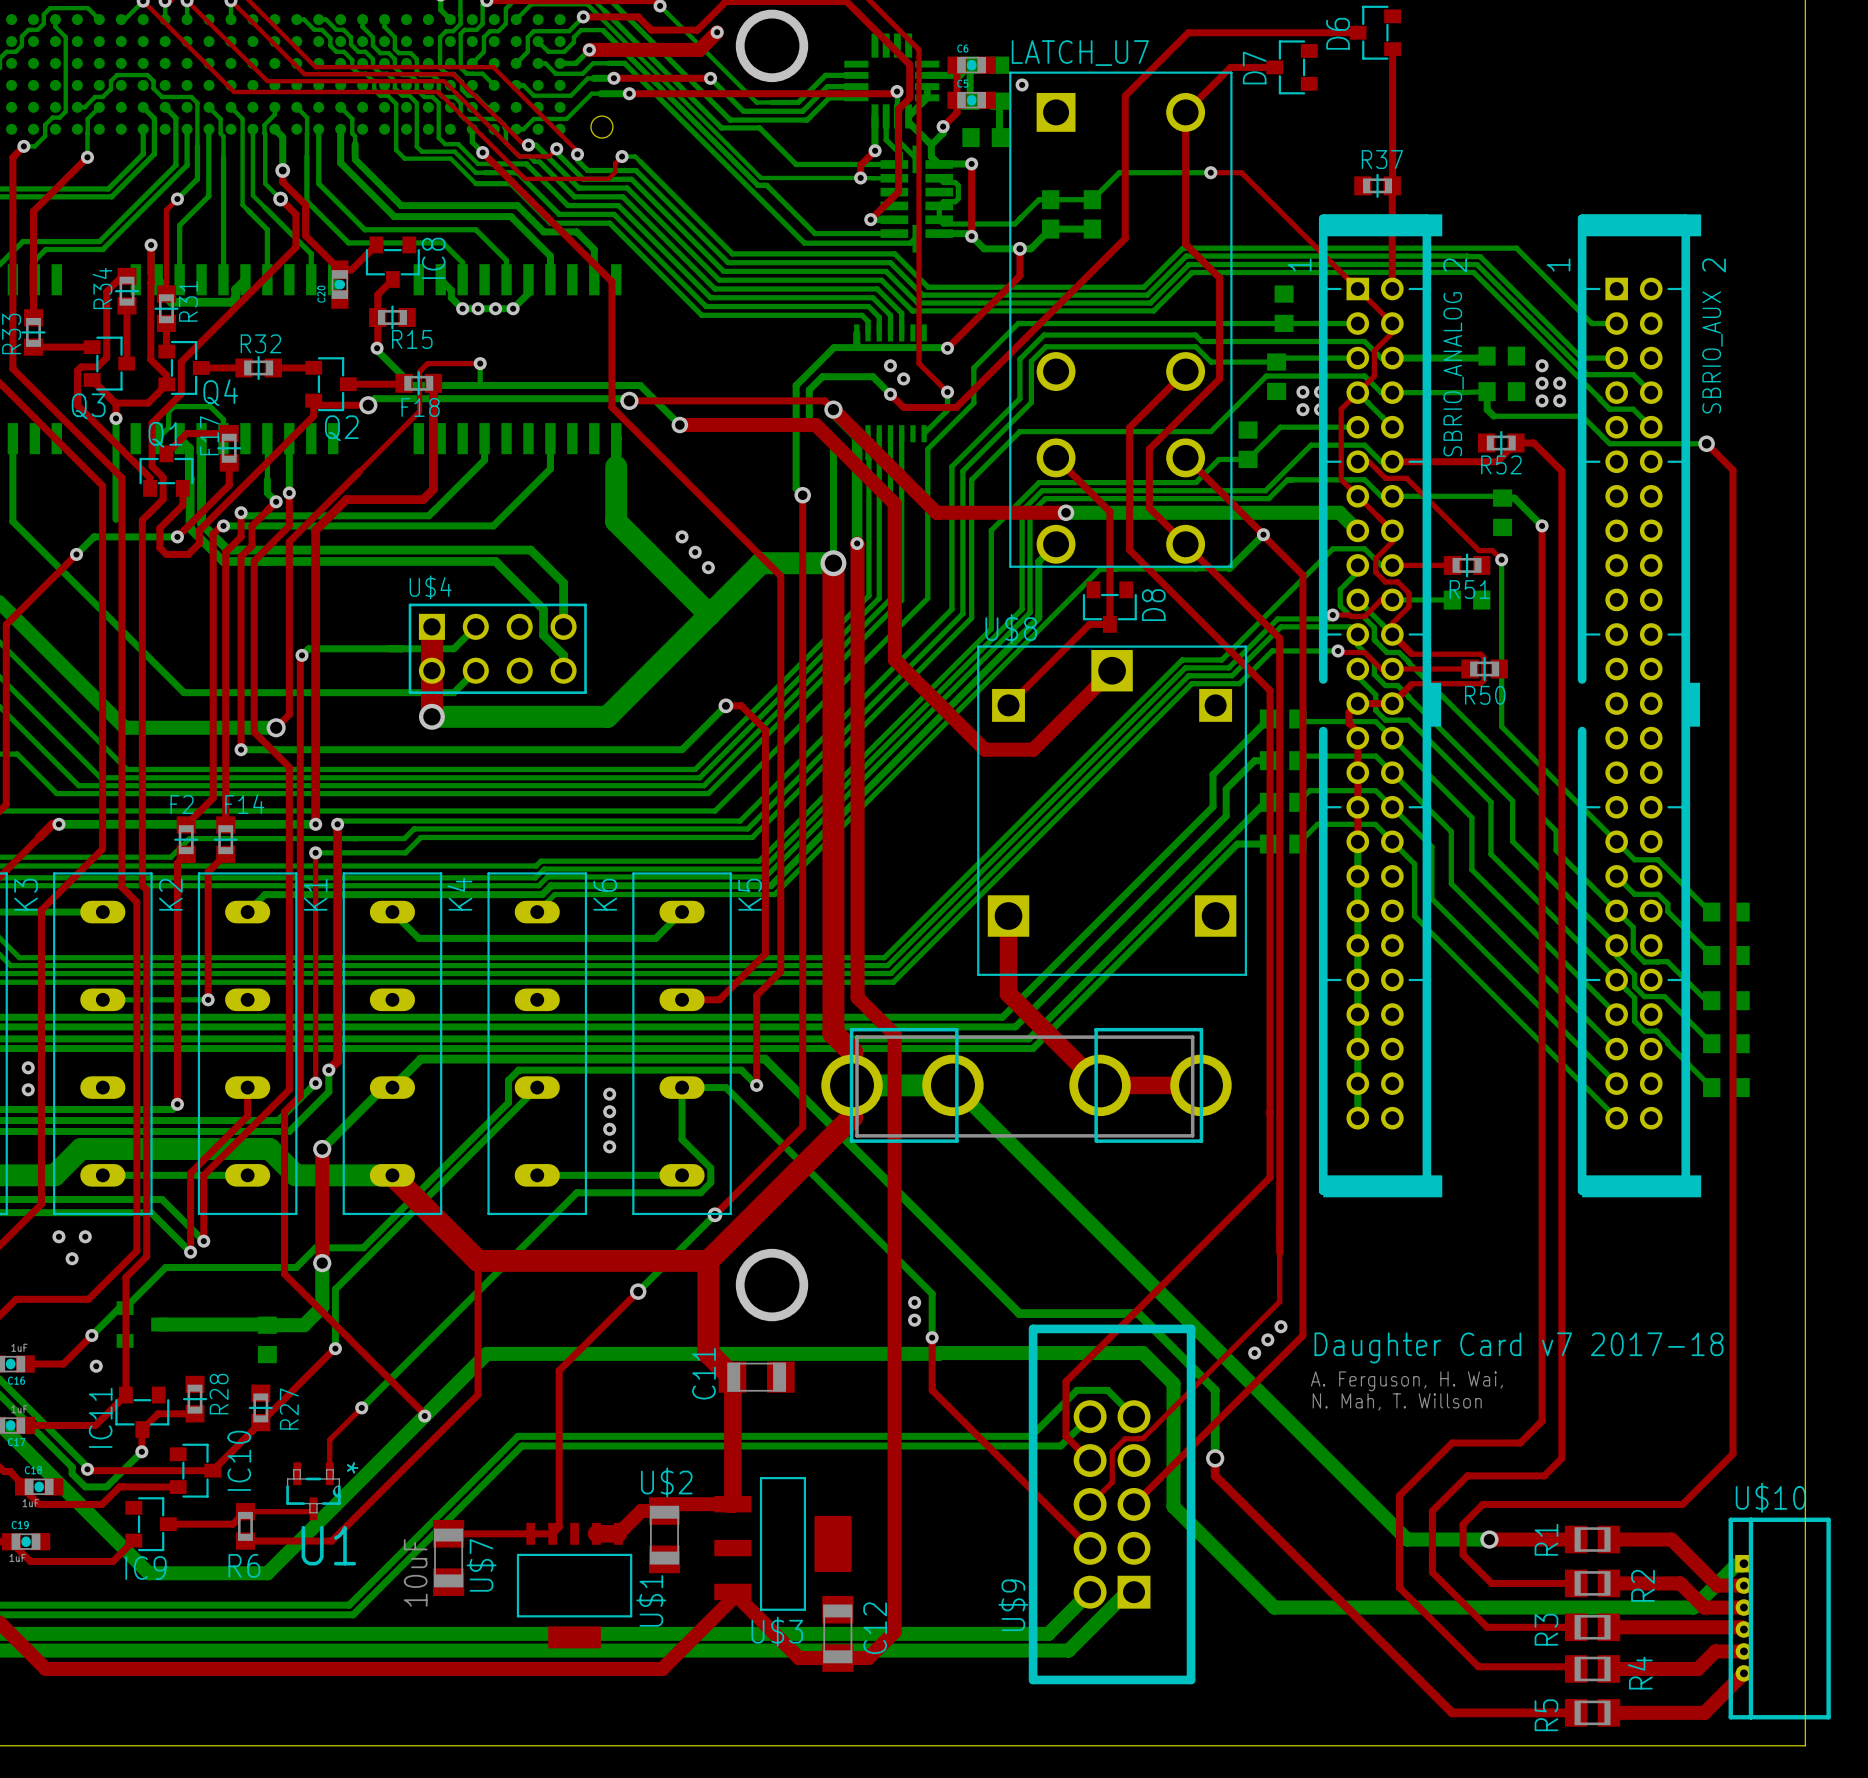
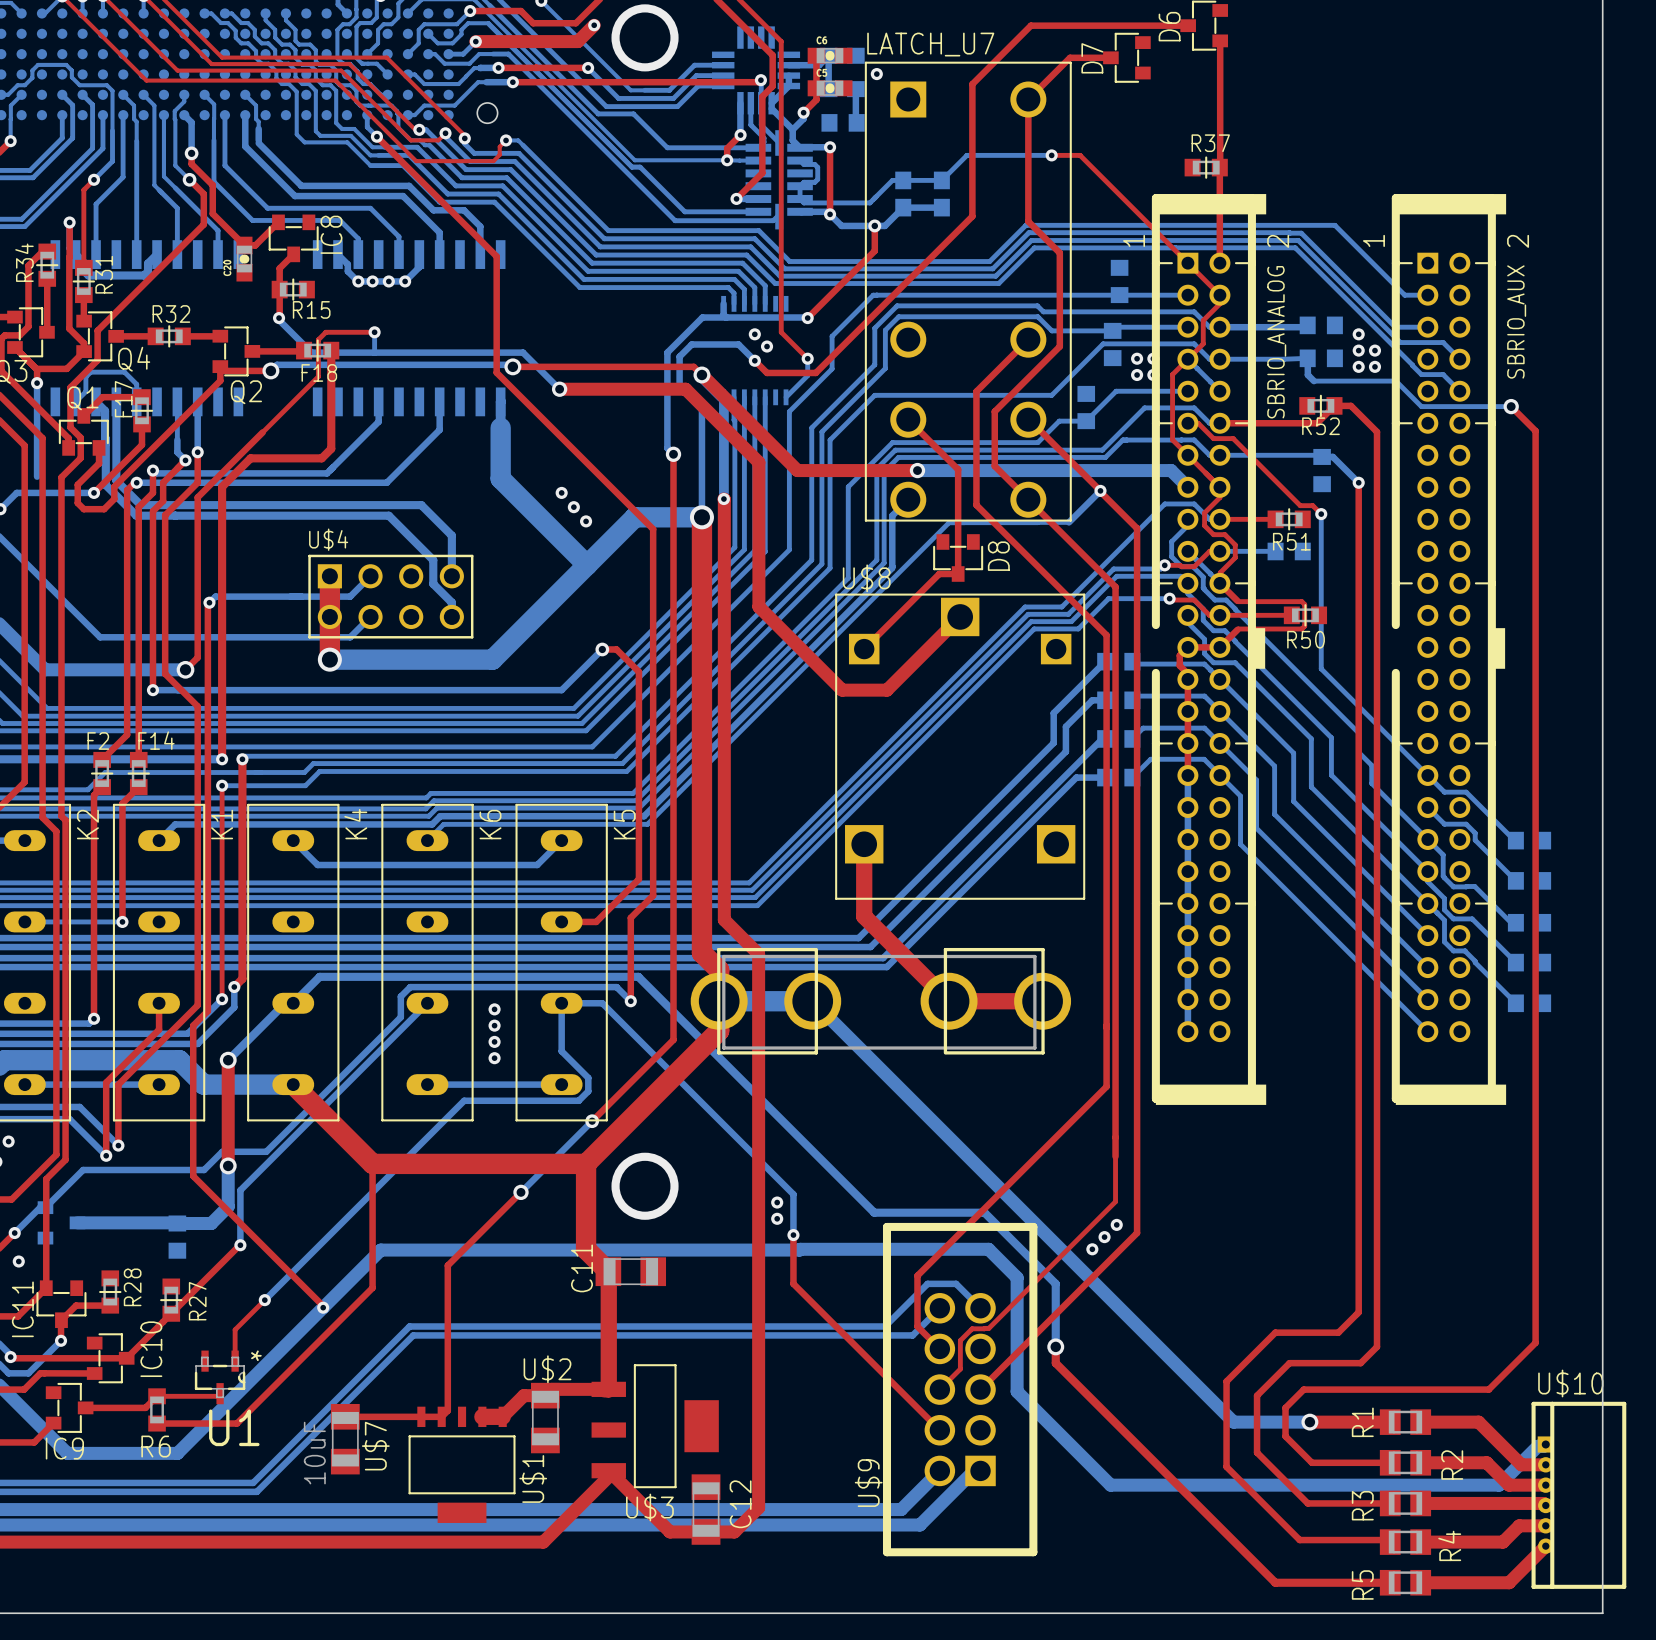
text: Daughter Card v7 2017-18 (1518, 1347) -> none
text: A. Ferguson, H. Wai, (1406, 1381) -> none
text: N. Mah, T. Willson (1397, 1401) -> none

